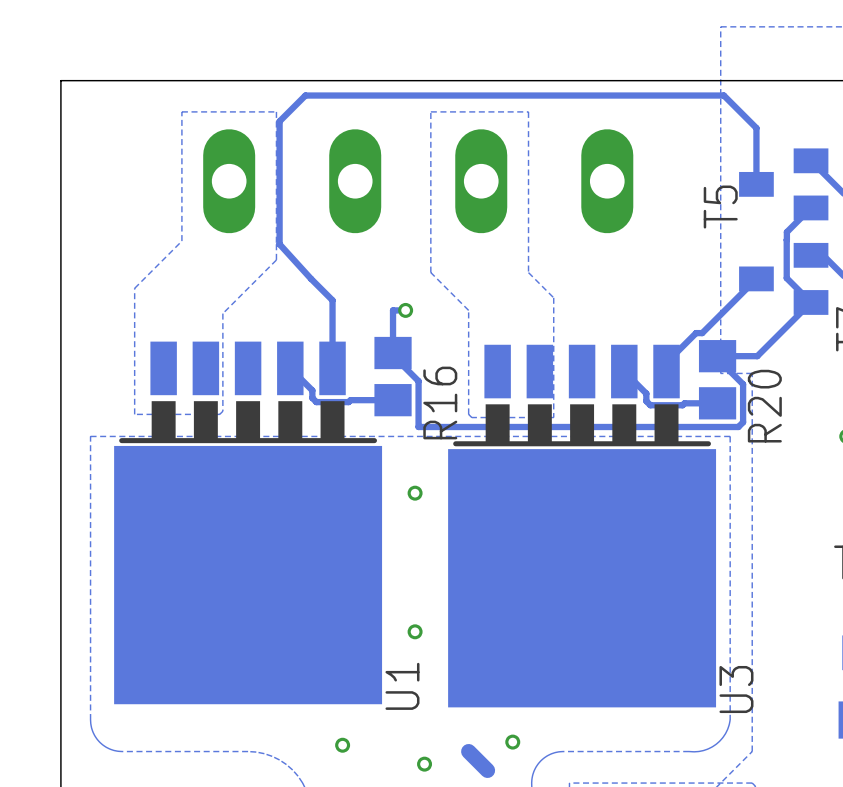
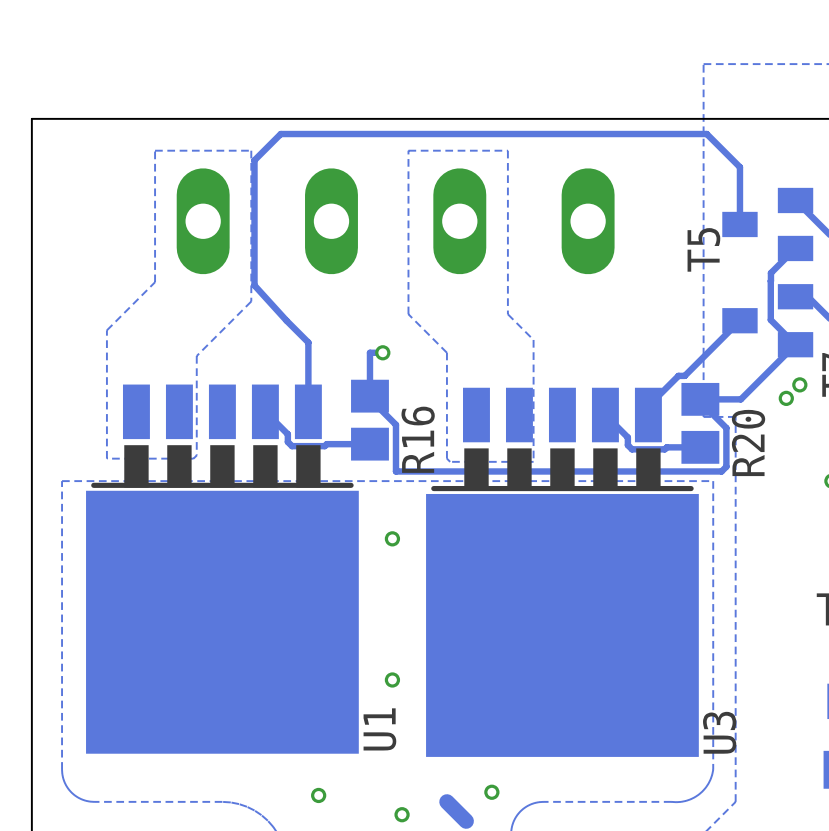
via: none -> (799, 384)
via: none -> (786, 398)

